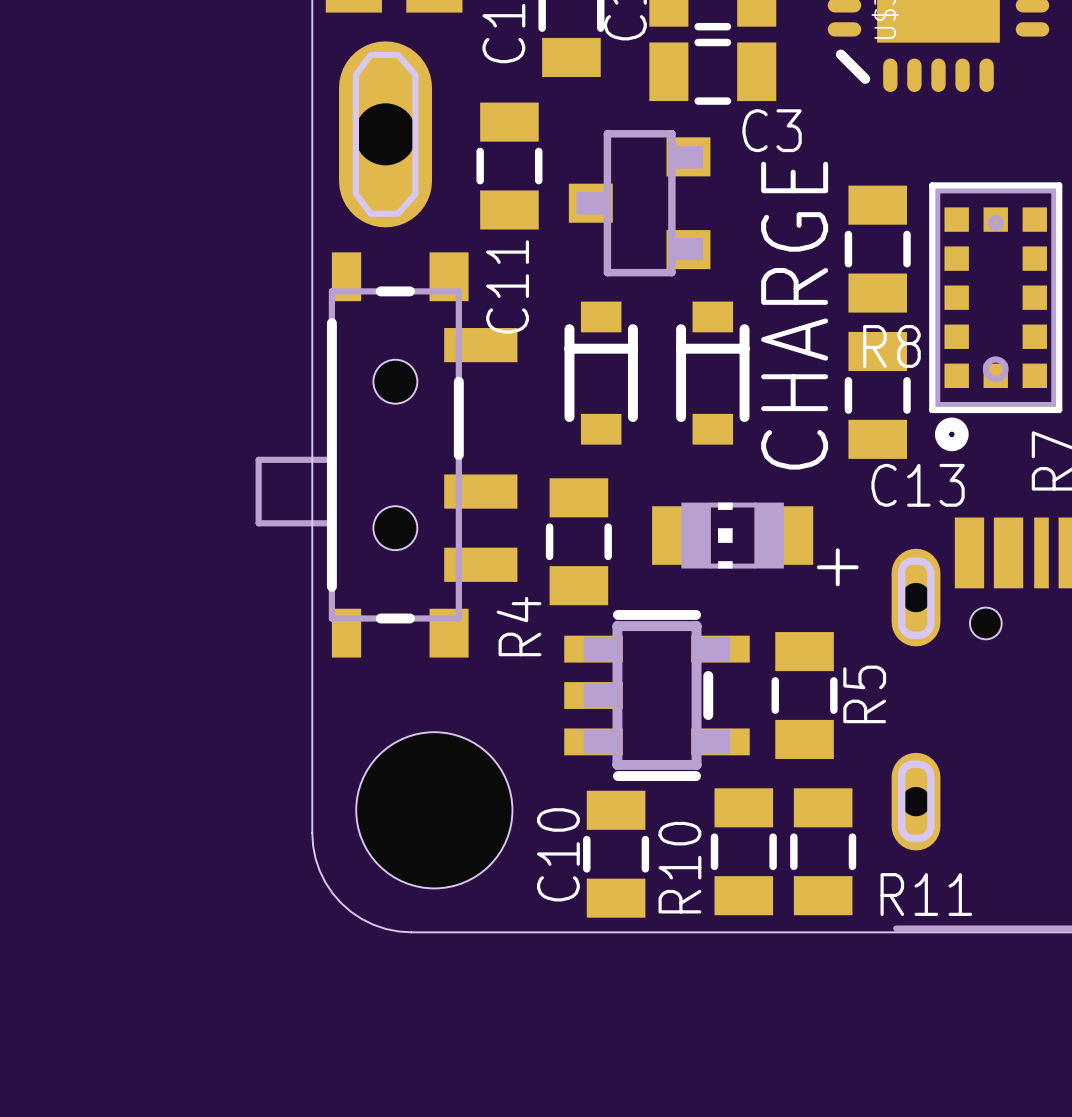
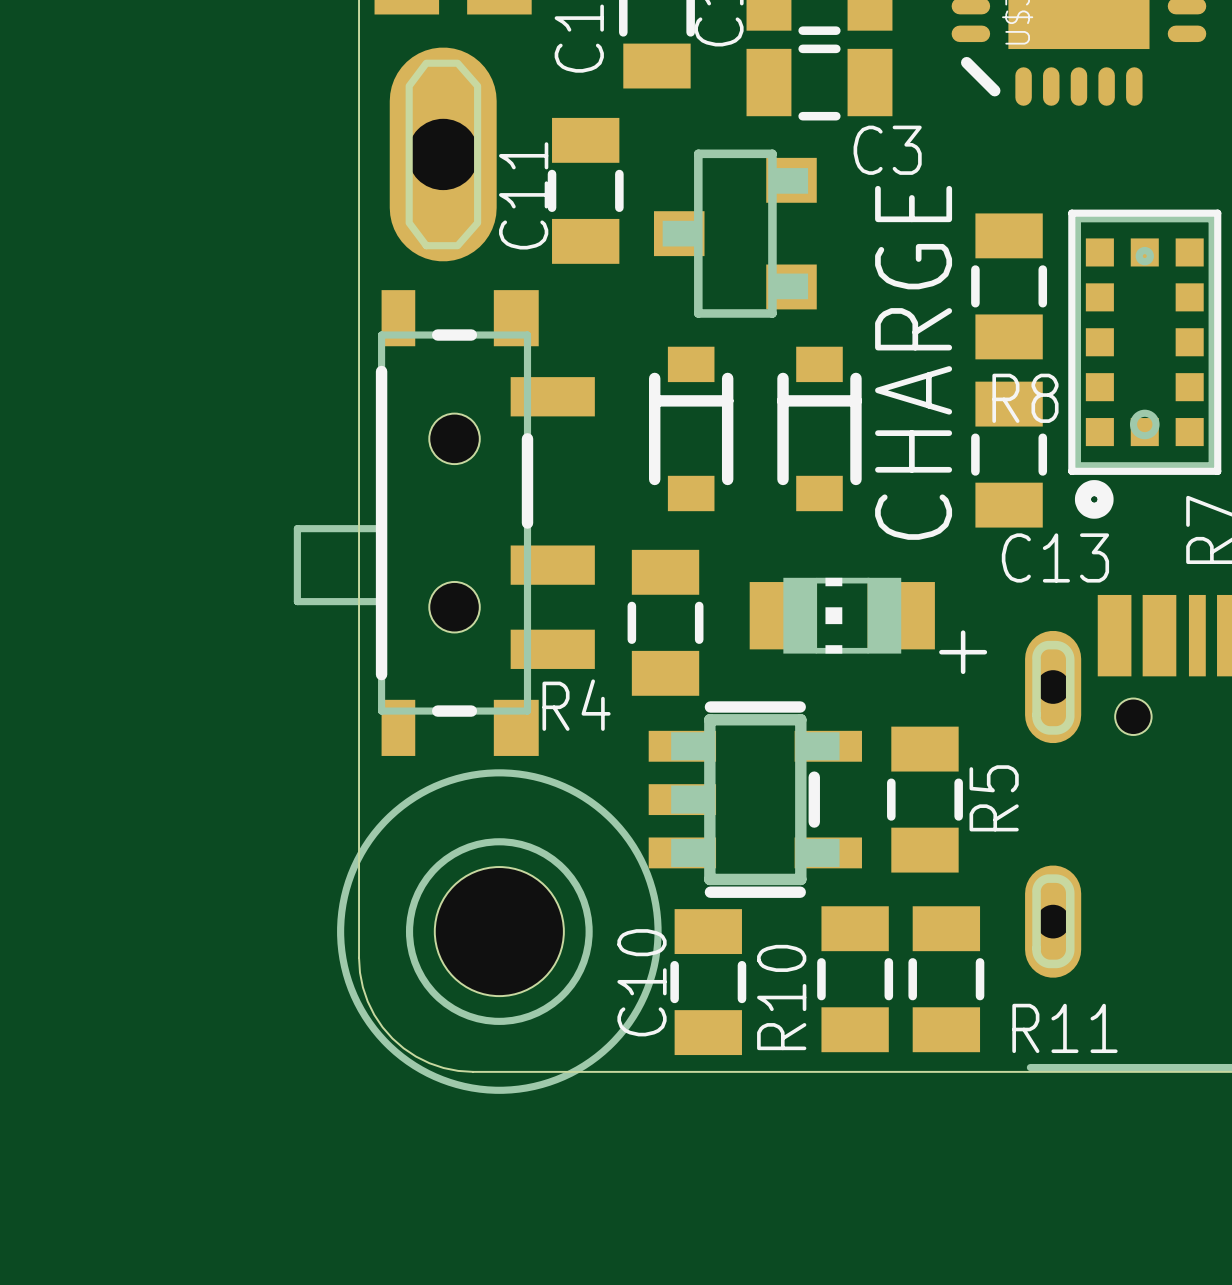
C11 name position: C11 (507, 286) -> C11 (523, 195)
R4 name rotation: 0° (519, 626) -> 90° clockwise (576, 705)
part footprint: [356, 732, 513, 889] -> [337, 769, 662, 1094]

